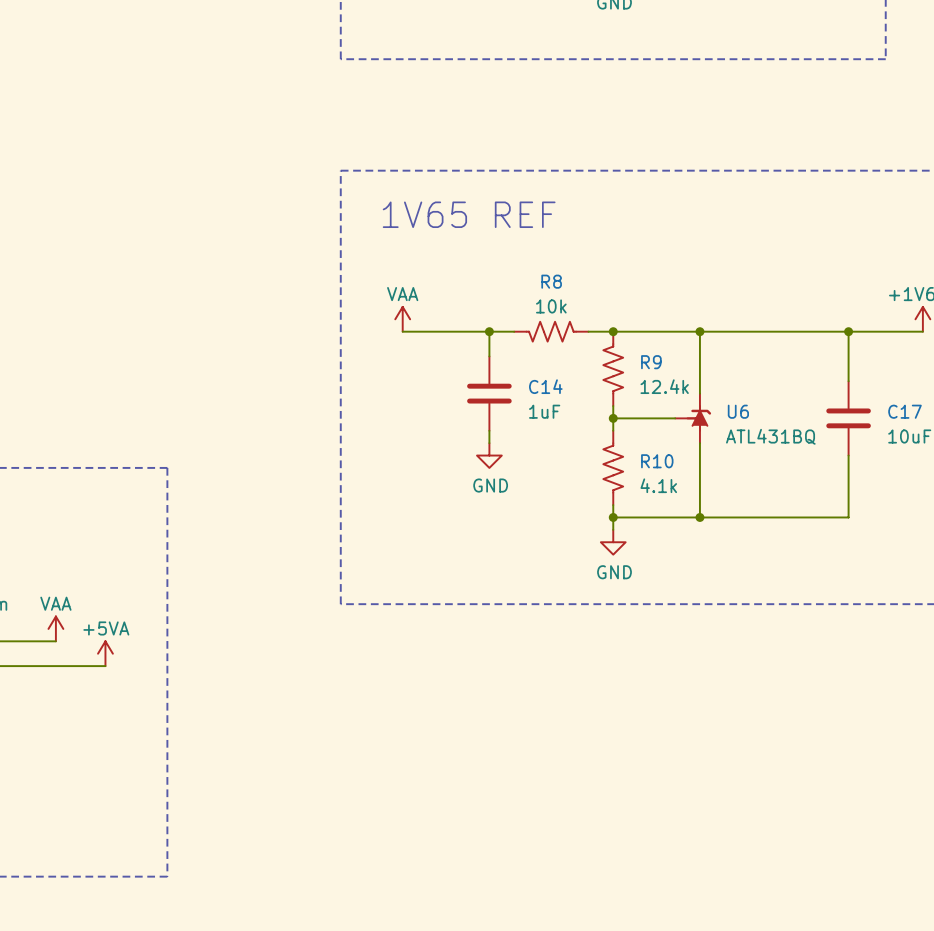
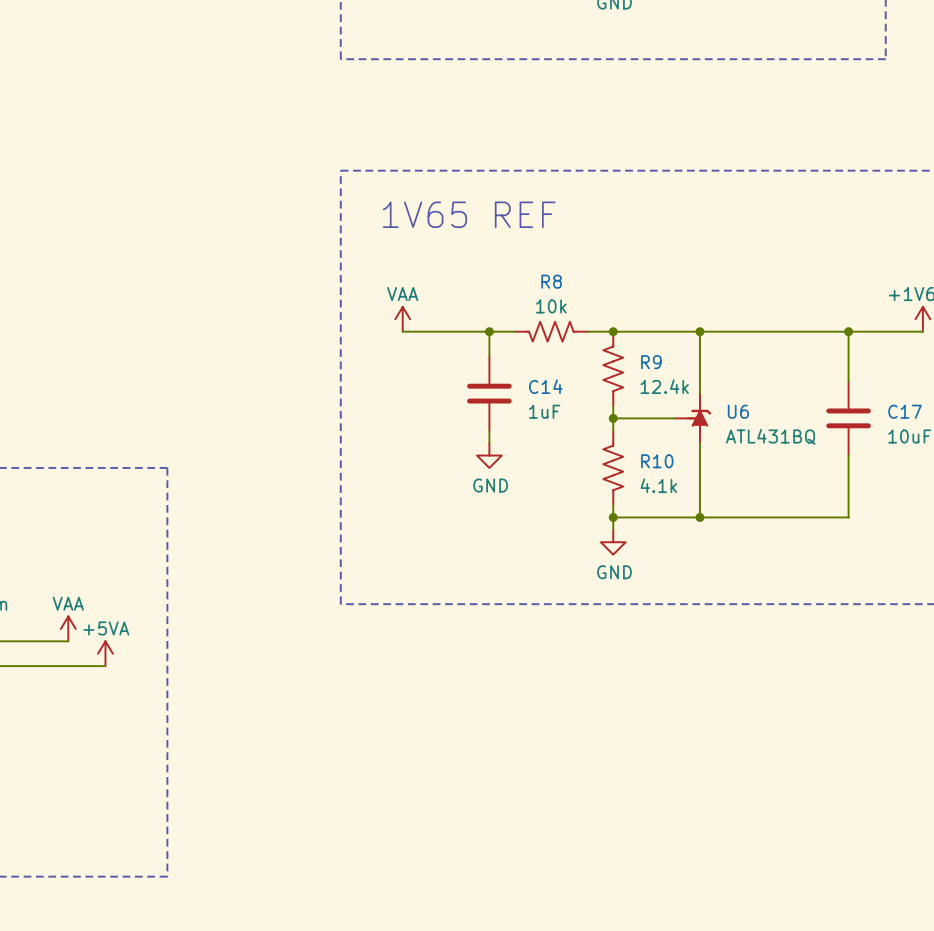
power symbol position: VAA (55, 628) -> VAA (68, 628)
wire: none -> (55, 641) (68, 641)

